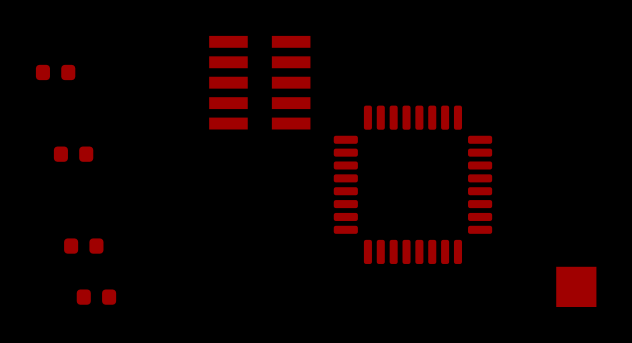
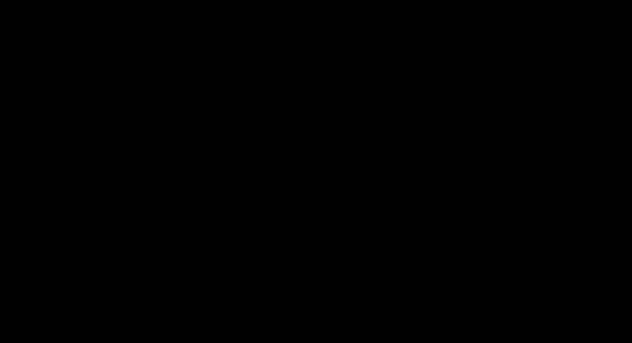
part: (55, 72) -> none
part: (259, 82) -> none
part: (73, 154) -> none
part: (412, 184) -> none
part: (83, 246) -> none
part: (576, 286) -> none
part: (96, 297) -> none

